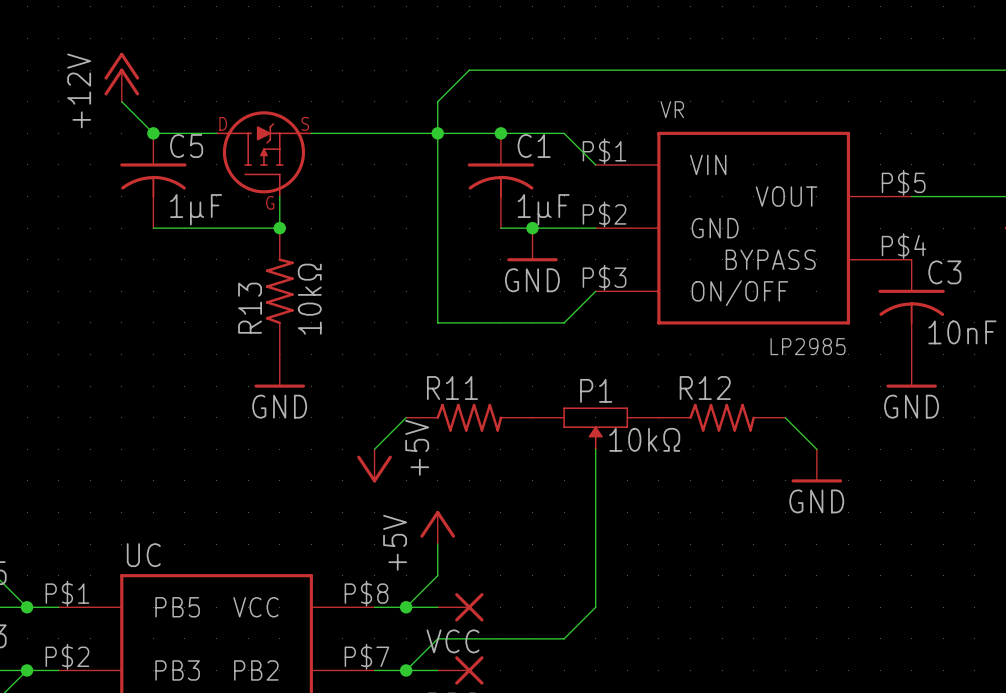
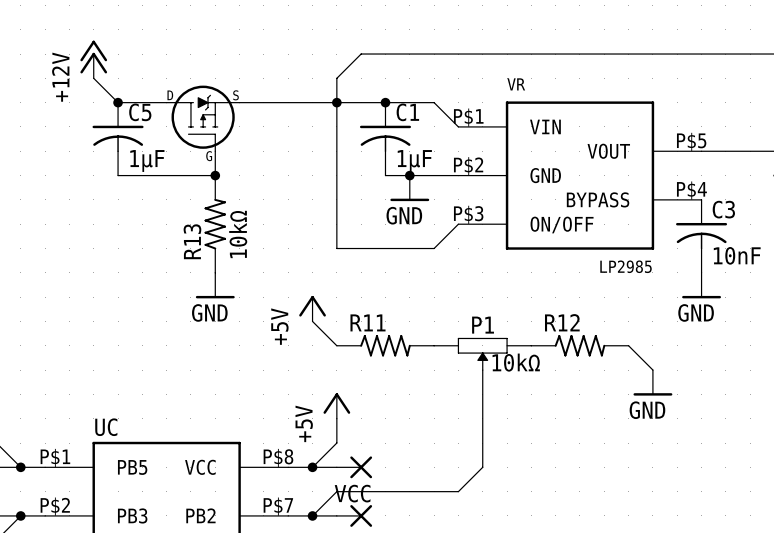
wire: (406, 417) (374, 449) -> (312, 321) (336, 345)
R11 position: (469, 417) -> (385, 345)
R12 position: (722, 417) -> (579, 345)
wire: (785, 417) (816, 449) -> (652, 370) (628, 345)
P1 position: (595, 428) -> (482, 354)
wire: (595, 449) (595, 607) (564, 638) -> (482, 370) (482, 467) (458, 491) (434, 491)
power symbol position: +5V (374, 465) -> +5V (312, 308)
power symbol position: GND (816, 465) -> GND (652, 382)
power symbol rotation: 0° (374, 469) -> 180° (312, 306)

